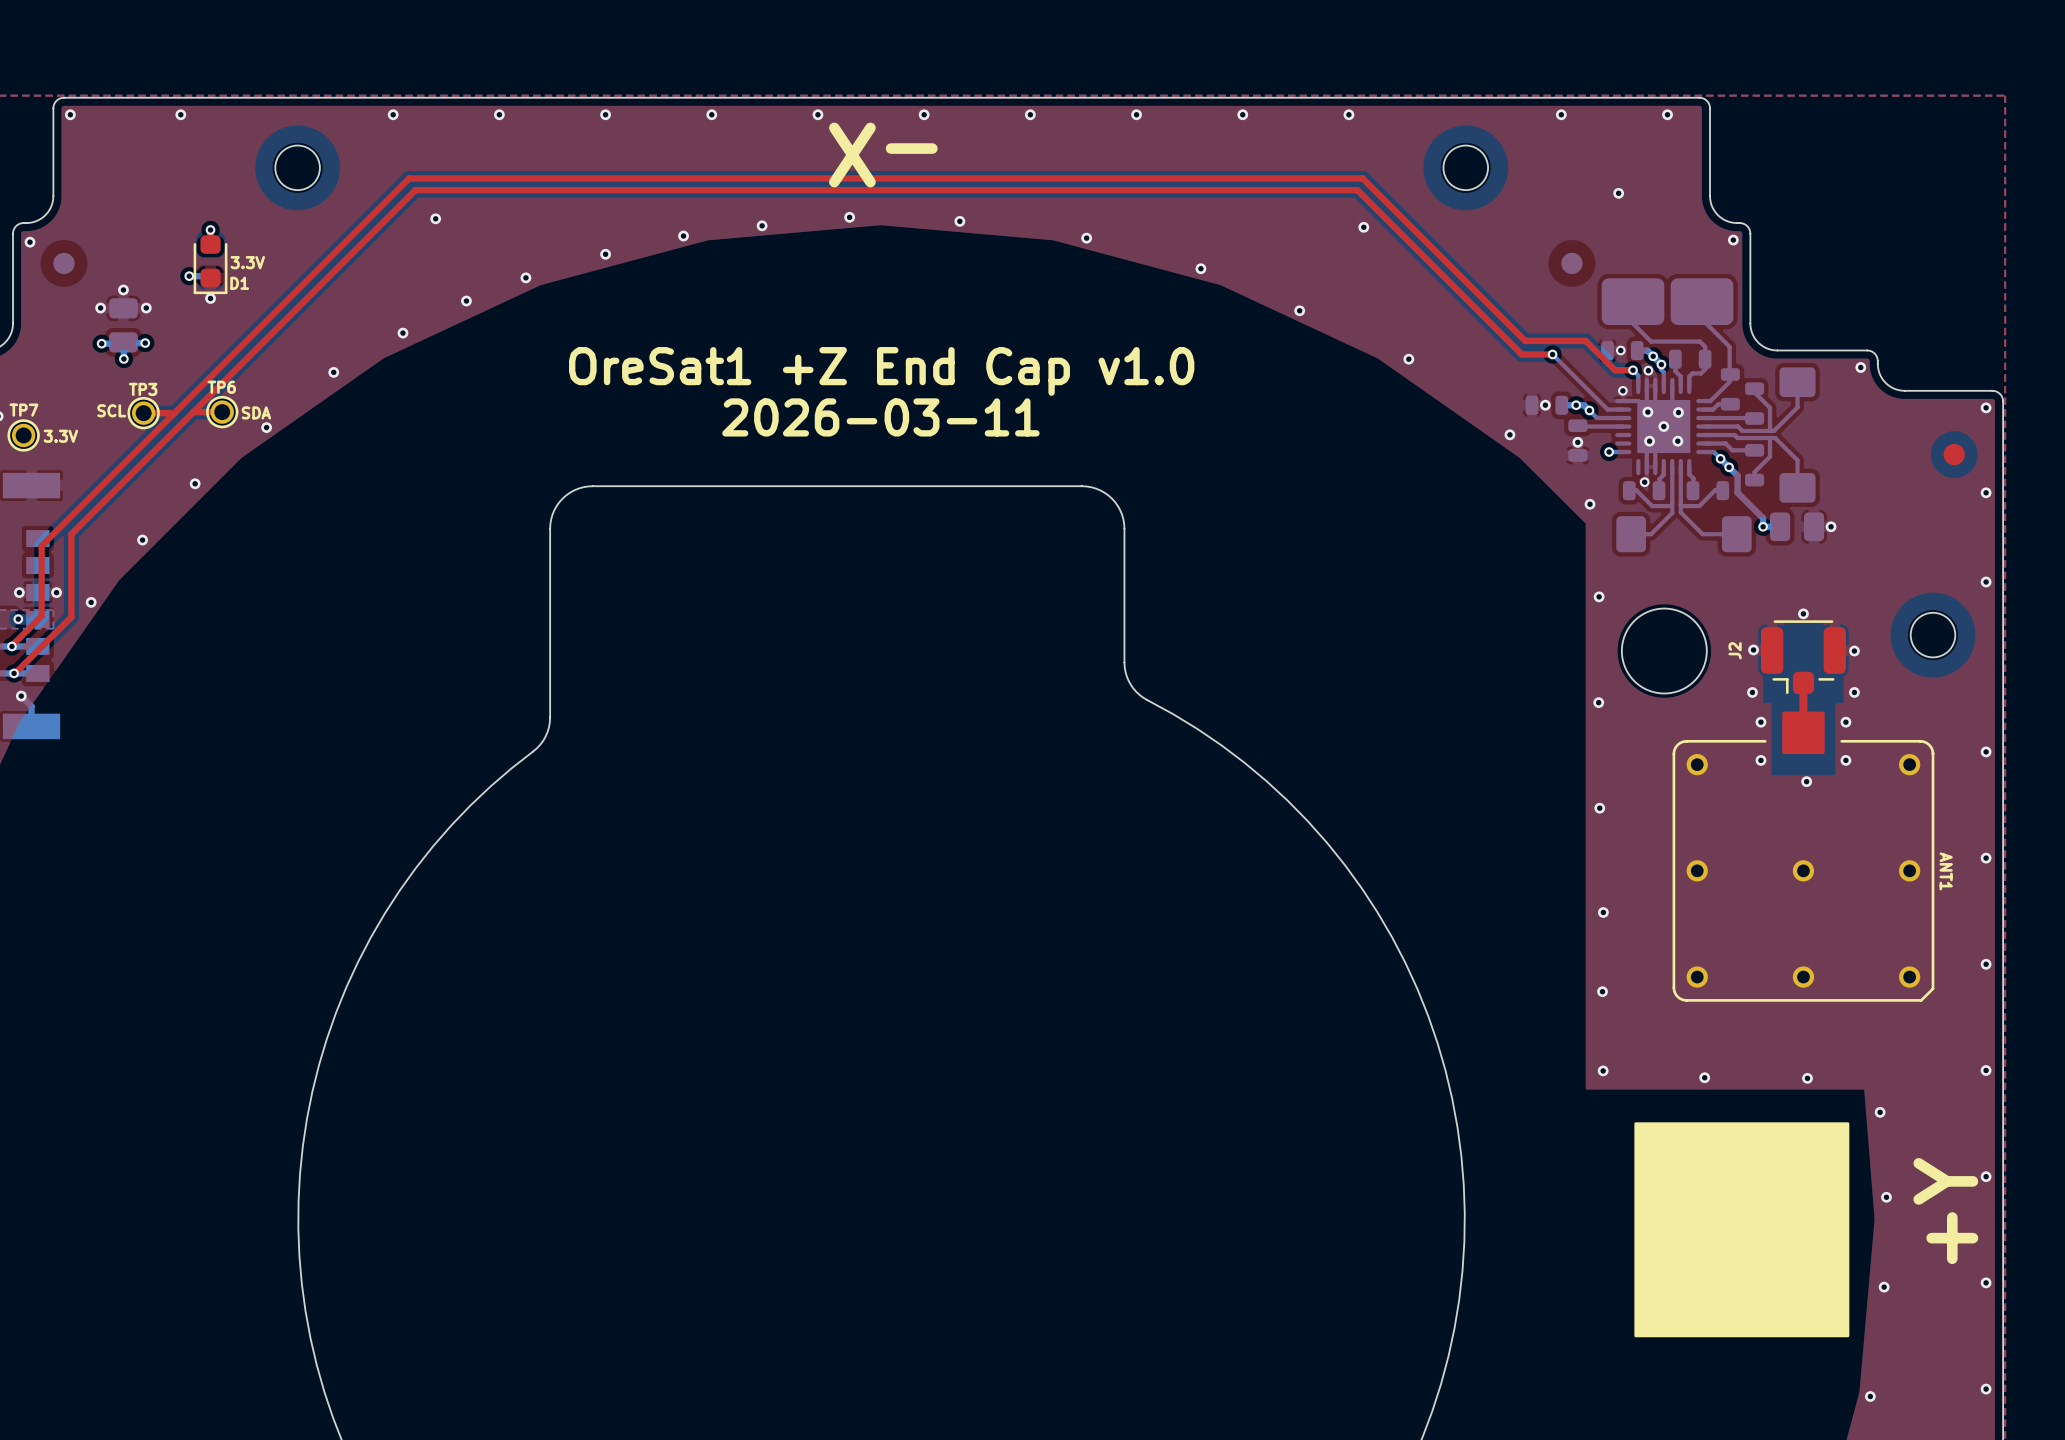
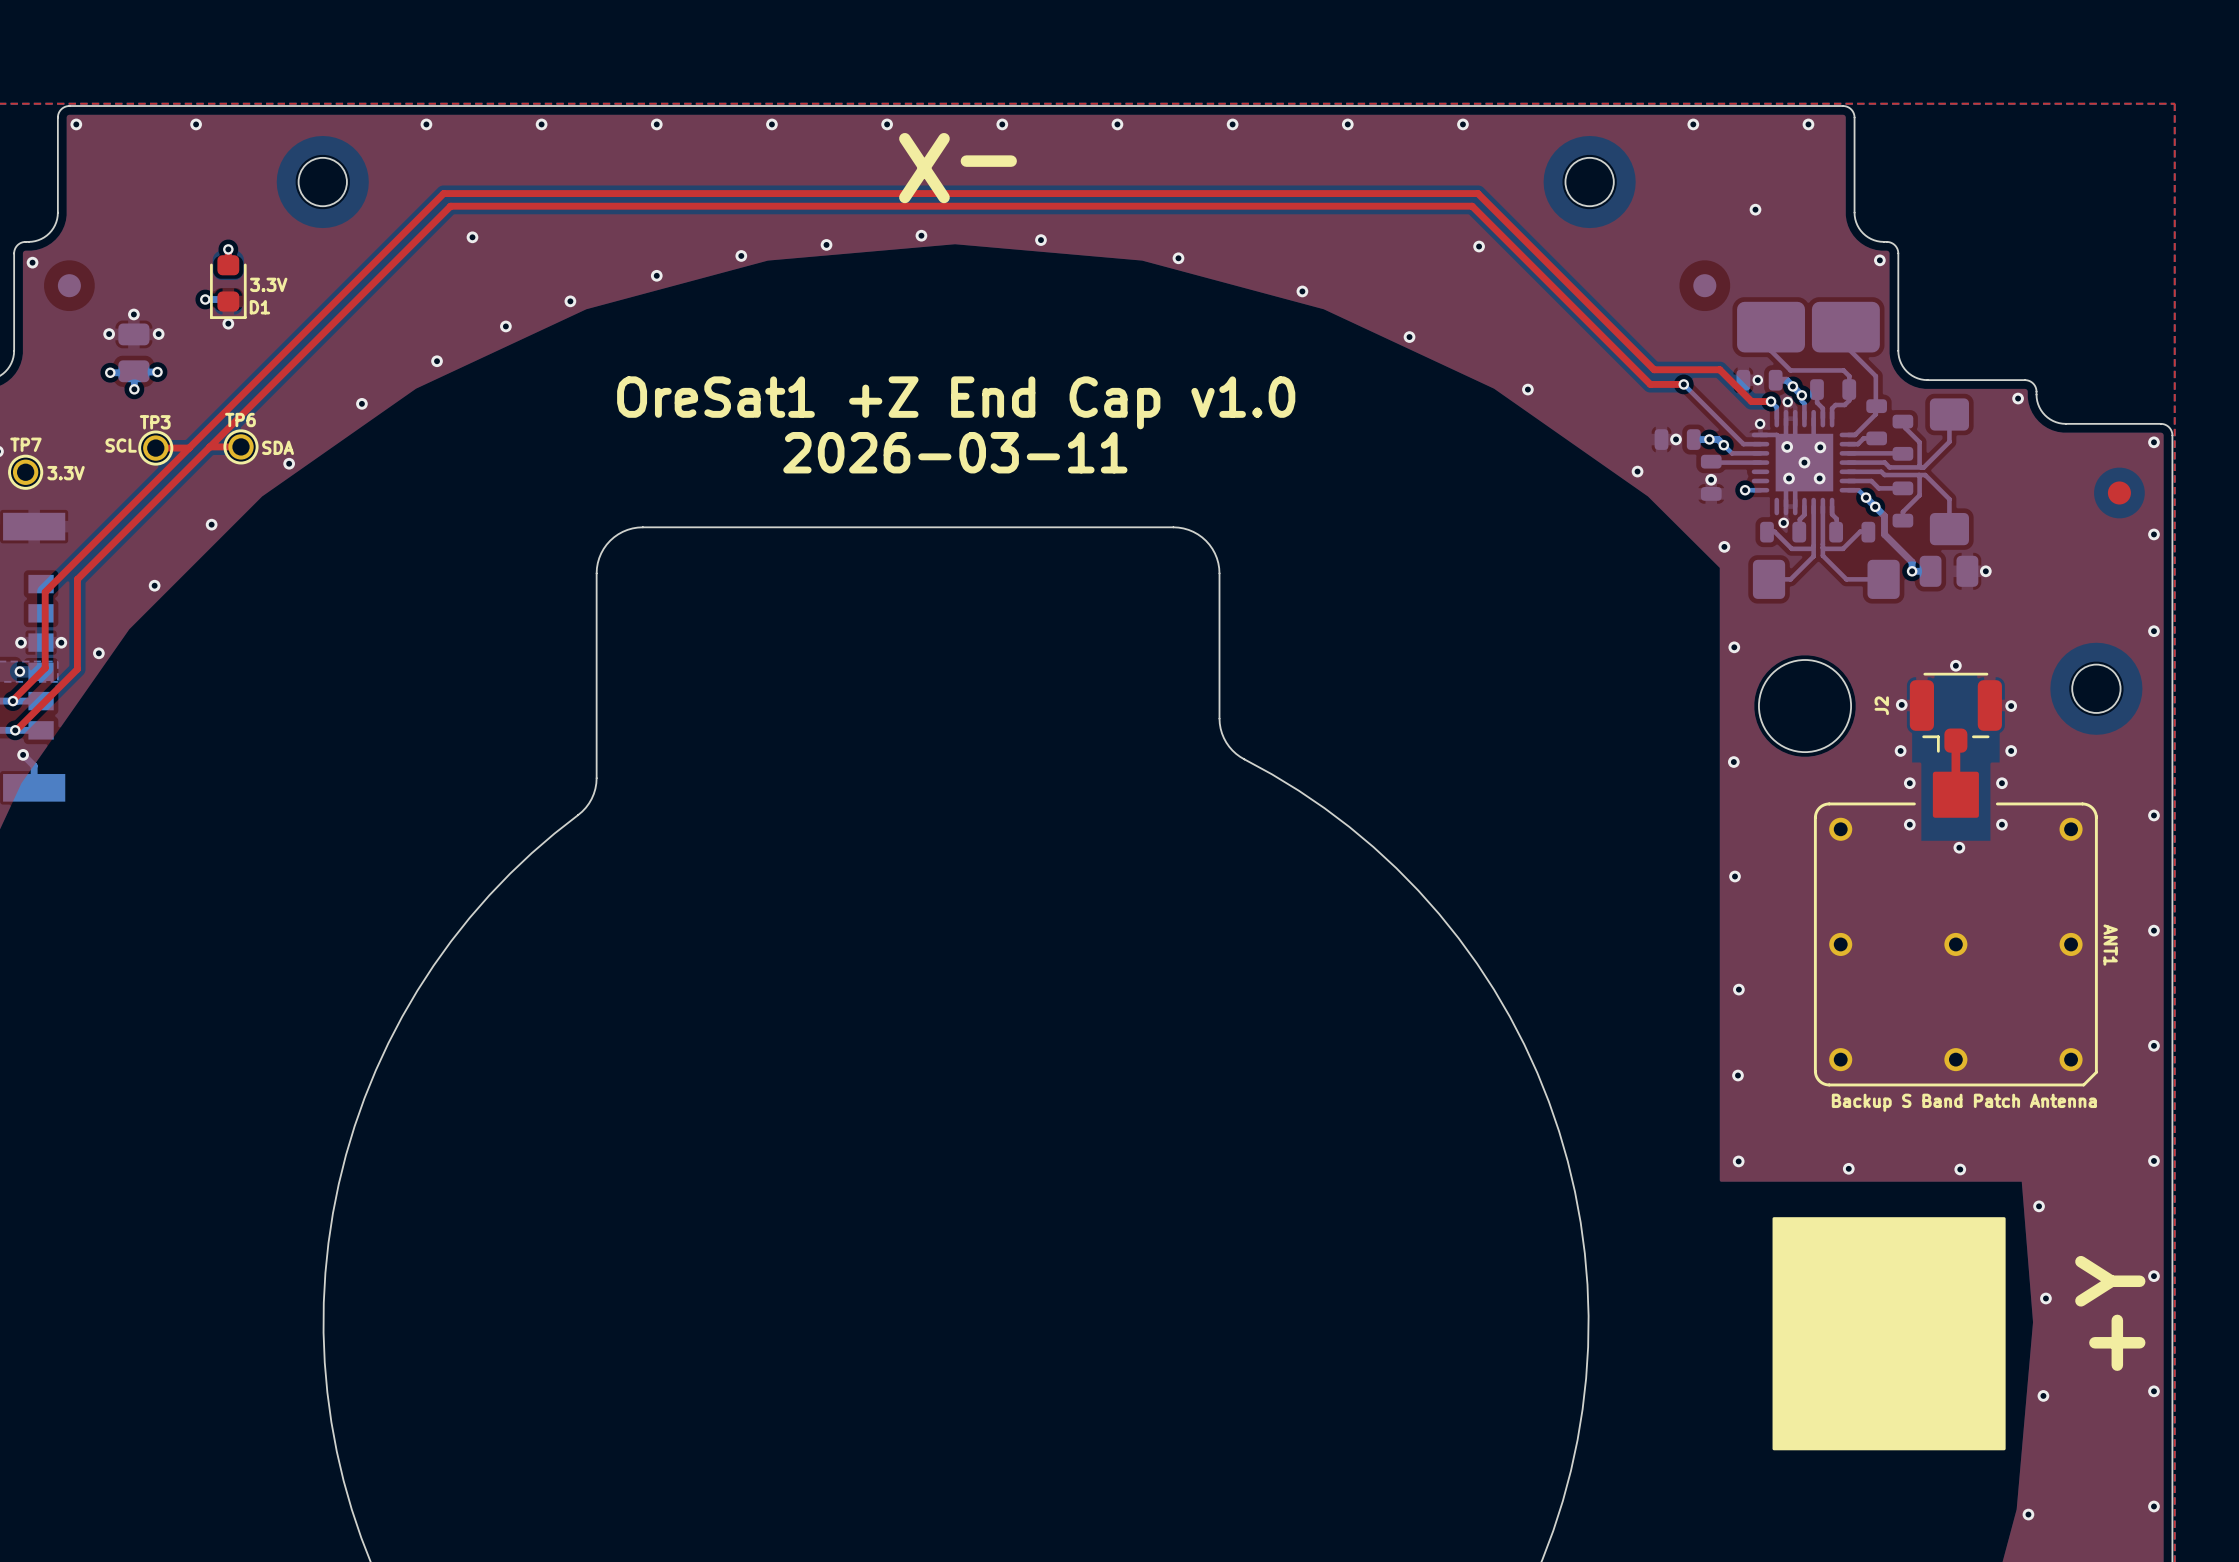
text: none -> Backup S Band Patch Antenna (1964, 1102)

